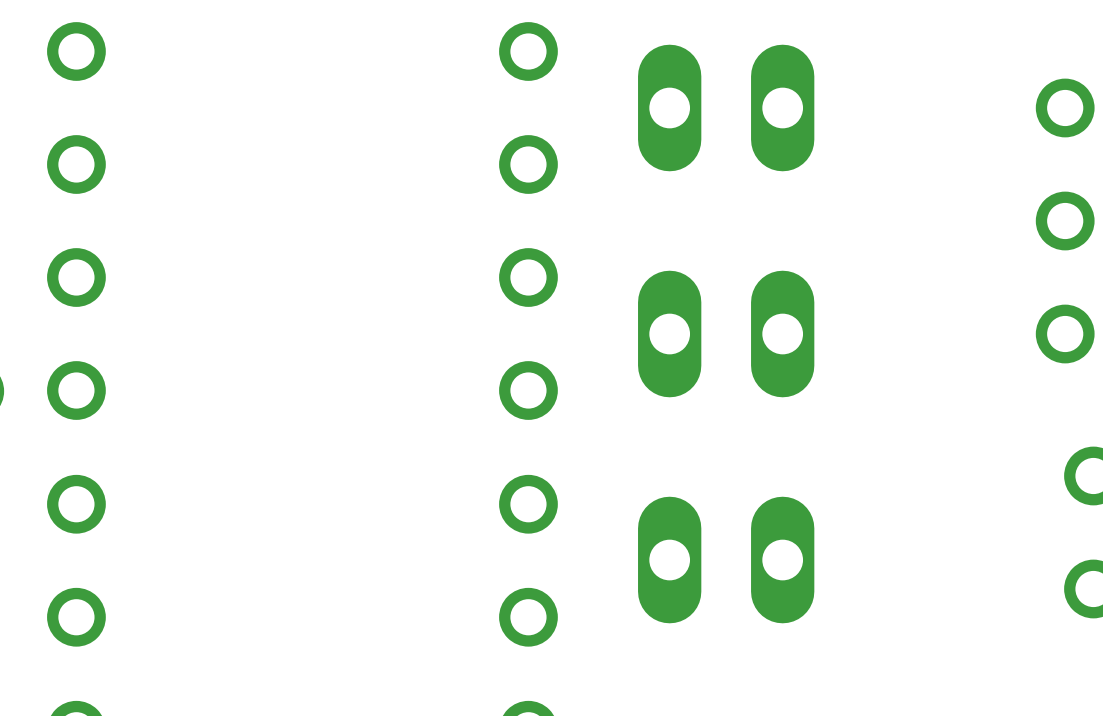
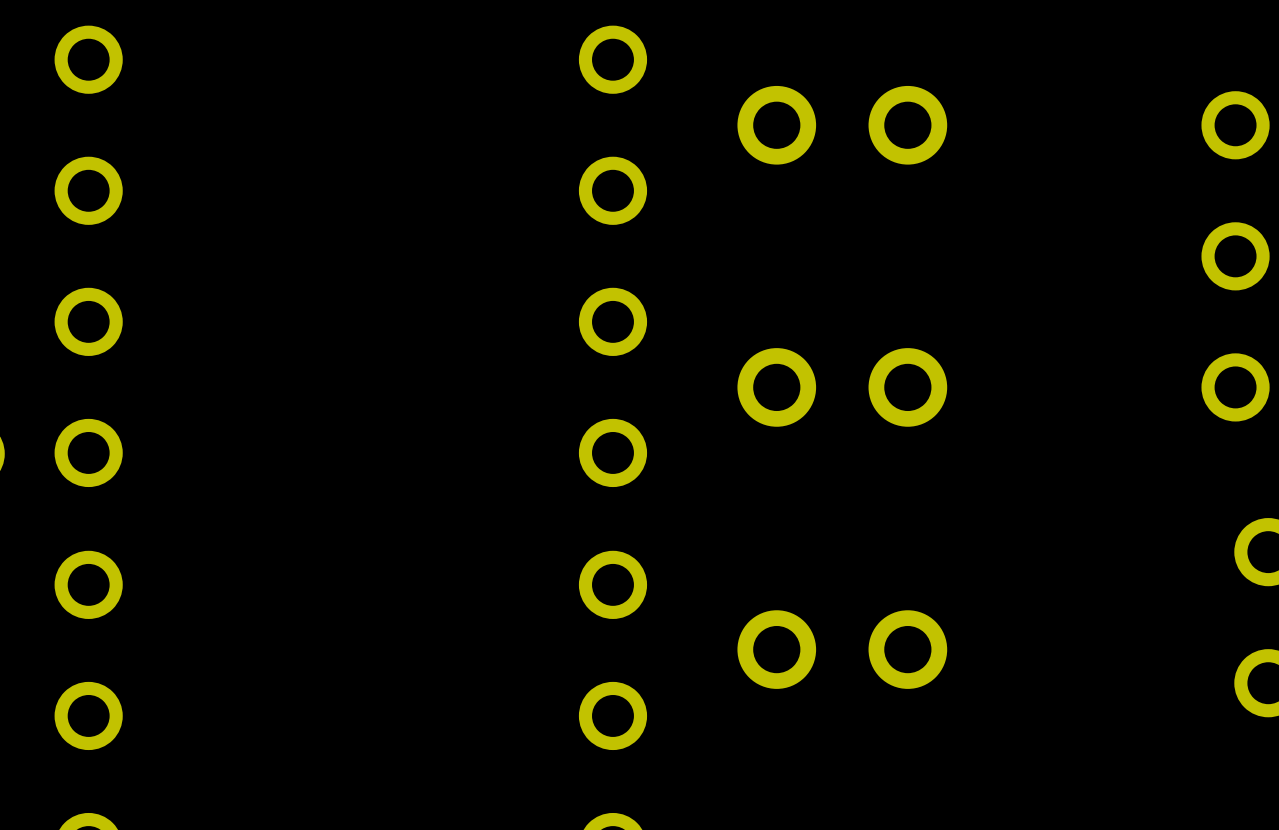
part footprint: [638, 44, 815, 172] -> [737, 85, 948, 165]
part footprint: [638, 270, 815, 398] -> [737, 348, 948, 427]
part footprint: [638, 496, 815, 624] -> [737, 610, 948, 689]

